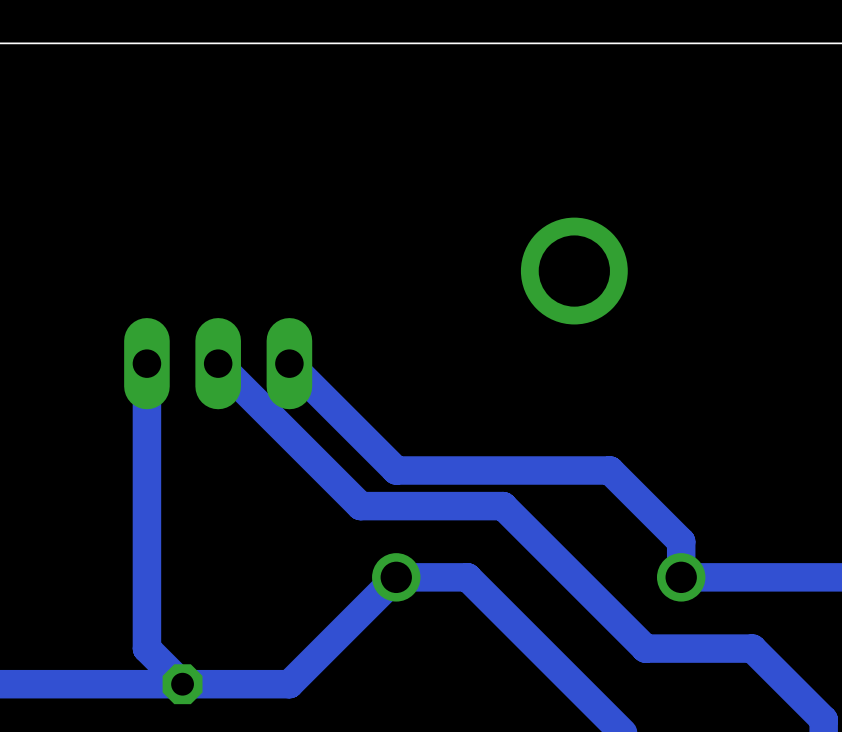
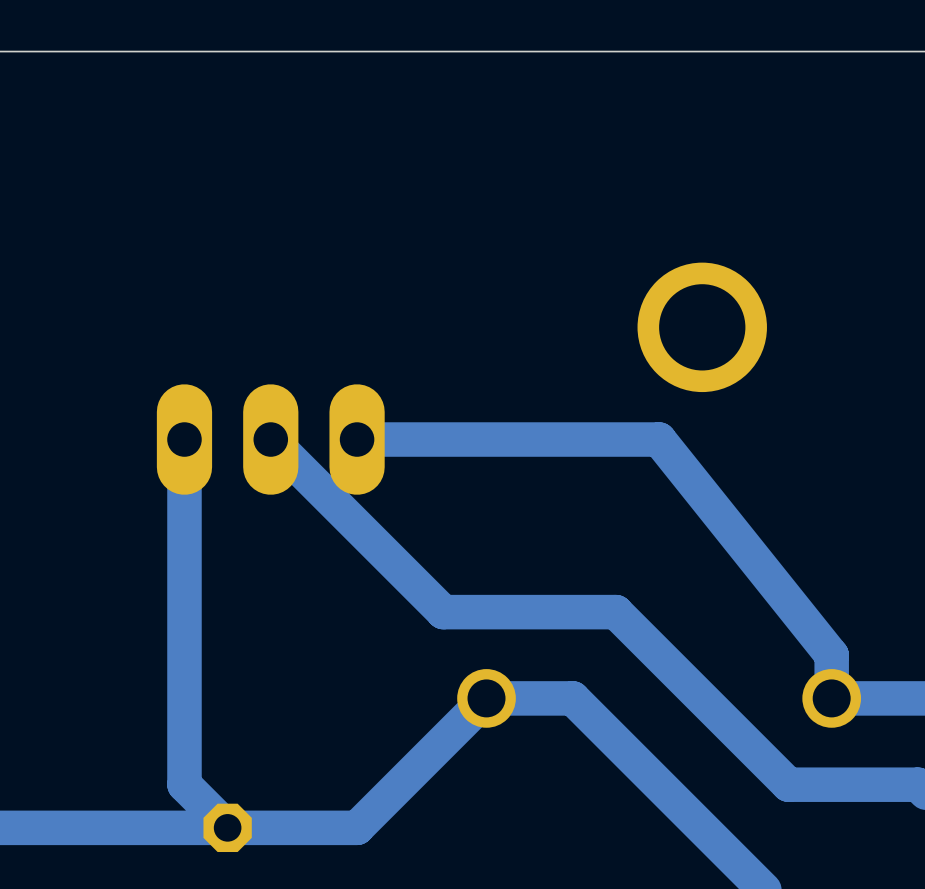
bottom track: (289, 363) (396, 470) (609, 470) (681, 541) -> (357, 439) (659, 439) (831, 655)

